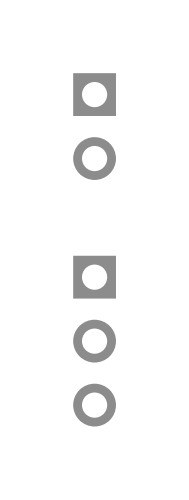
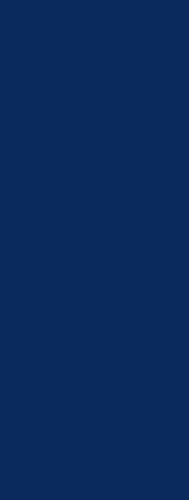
part: (94, 126) -> none
part: (94, 341) -> none

